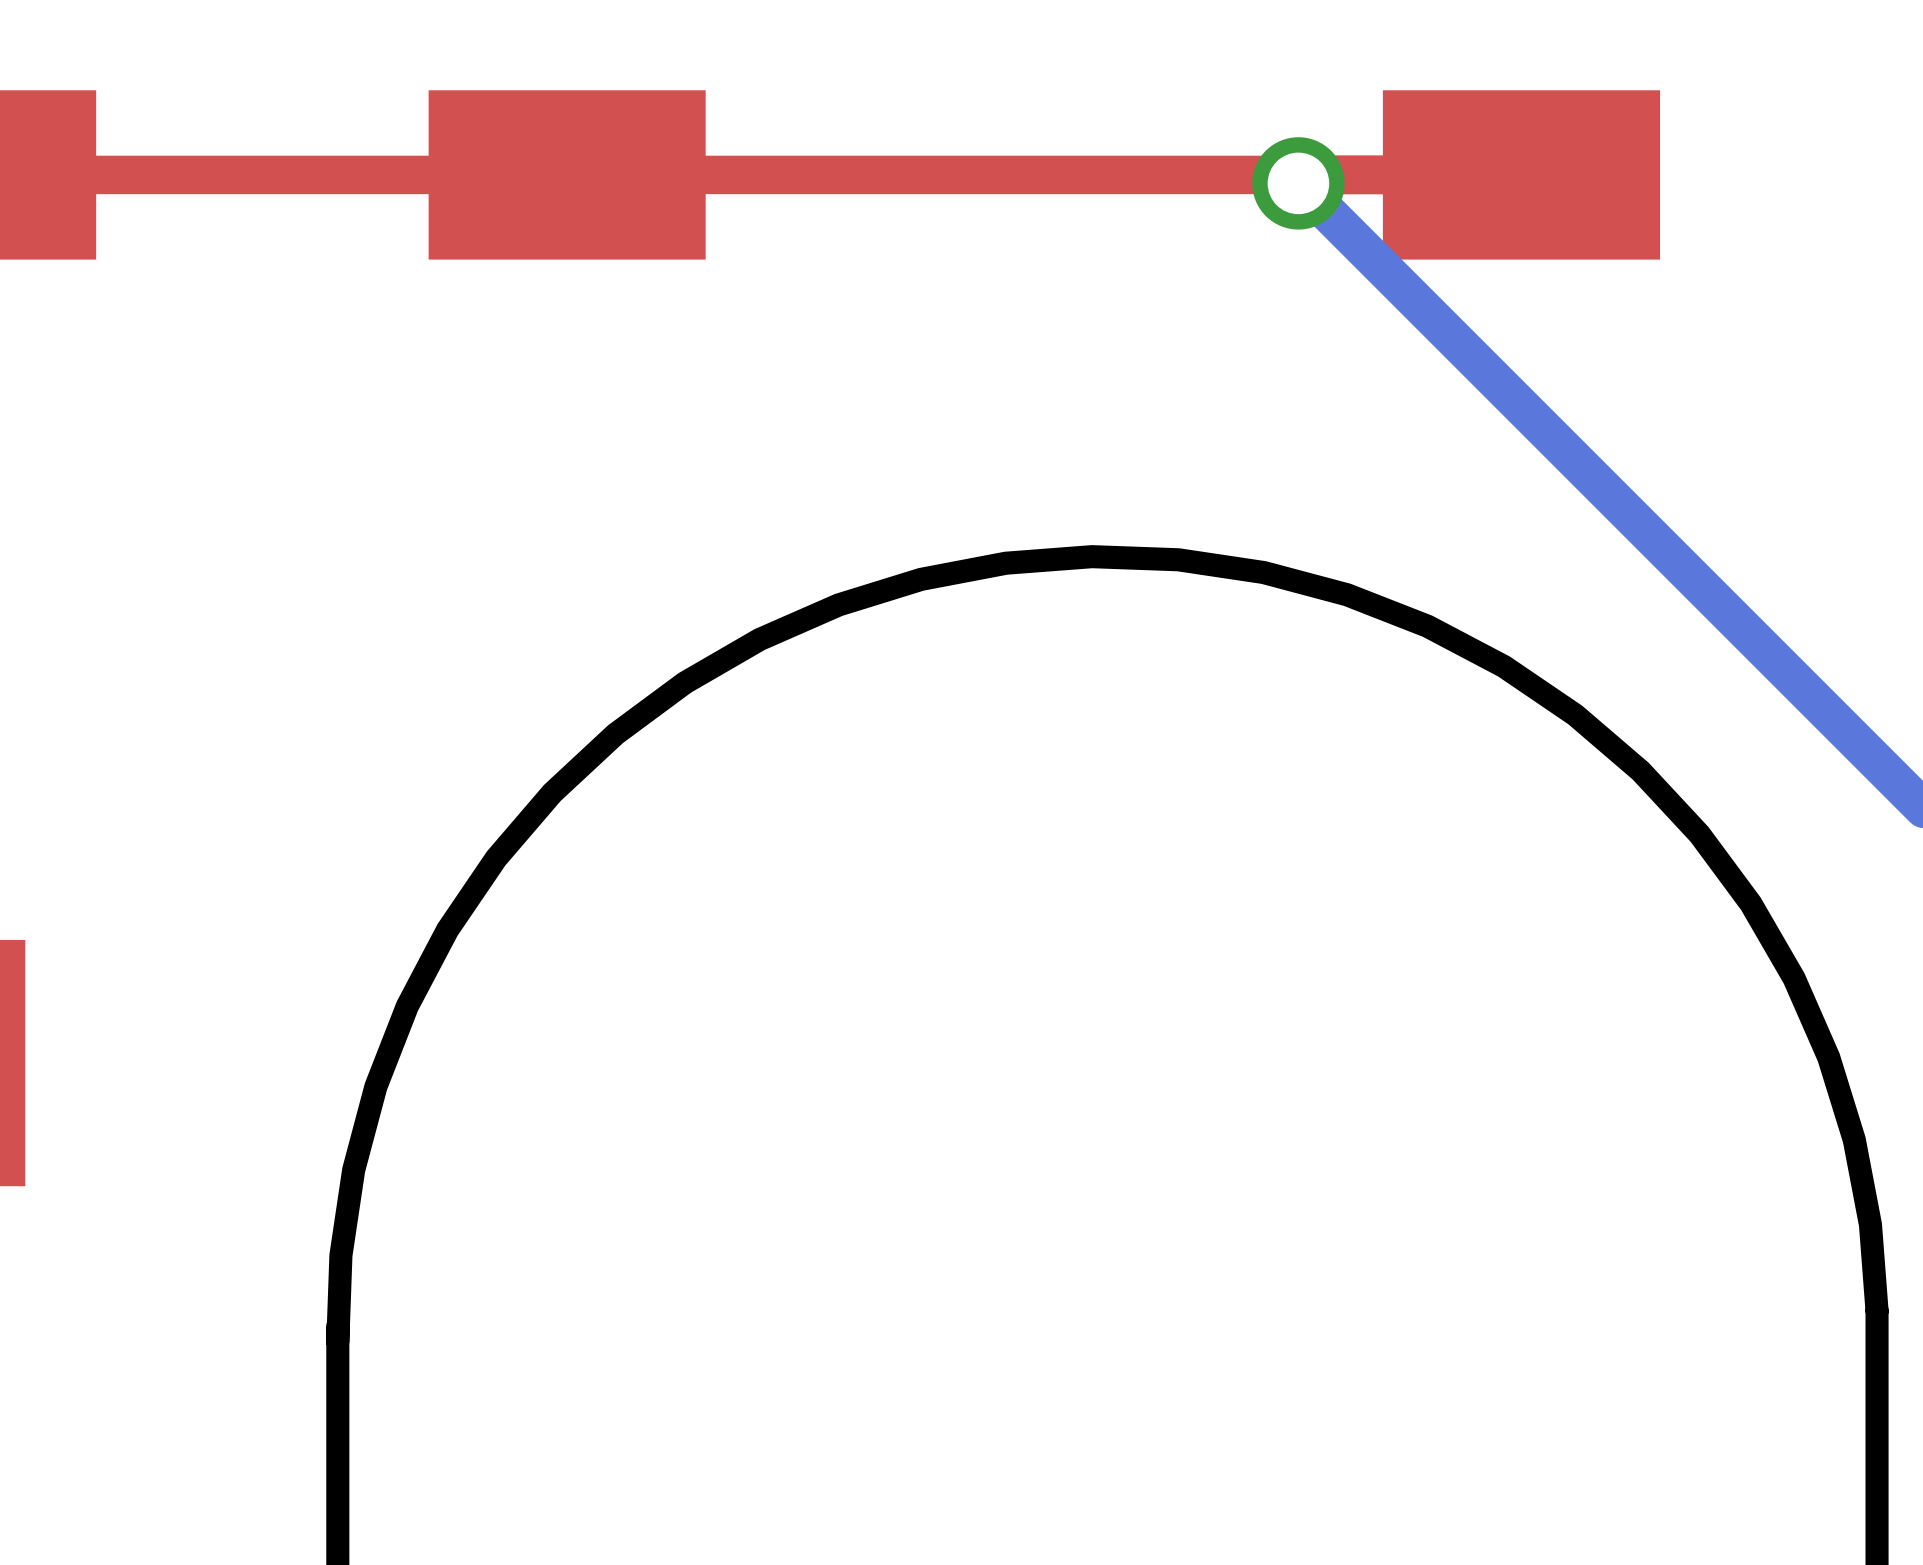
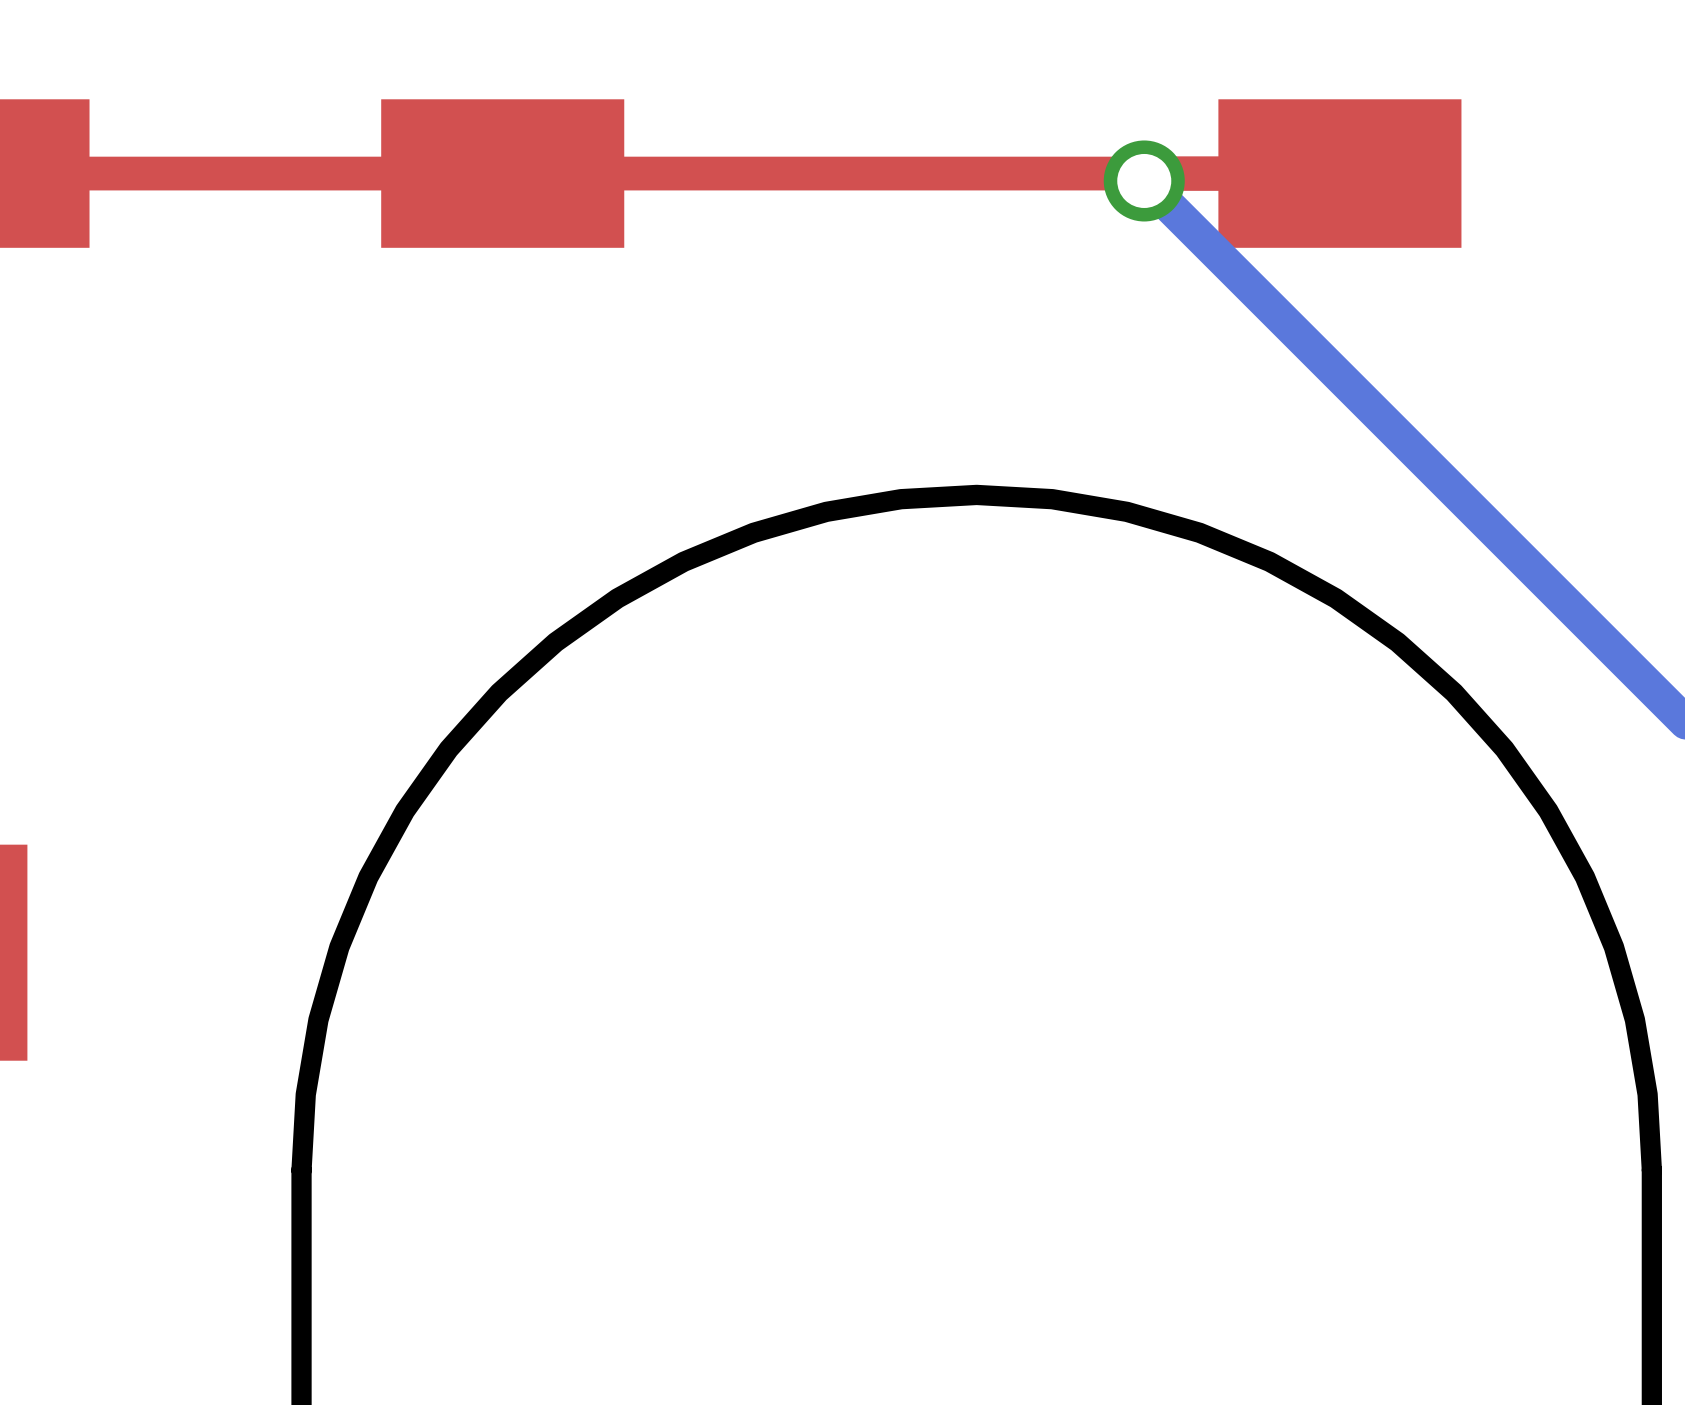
board edge: (1877, 1310) (1870, 1224) (1854, 1140) (1828, 1057) (1794, 978) (1750, 903) (1699, 834) (1640, 771) (1575, 714) (1503, 666) (1427, 626) (1347, 594) (1263, 572) (1178, 559) (1092, 556) (1005, 563) (921, 579) (838, 604) (759, 639) (684, 682) (615, 734) (552, 792) (496, 858) (447, 929) (407, 1006) (375, 1086) (353, 1170) (340, 1255) (337, 1341) -> (1651, 1170) (1647, 1094) (1634, 1019) (1613, 947) (1584, 877) (1548, 810) (1504, 749) (1454, 692) (1397, 642) (1335, 598) (1269, 561) (1199, 532) (1126, 511) (1052, 499) (976, 494) (901, 499) (826, 511) (753, 532) (683, 561) (617, 598) (555, 642) (499, 692) (448, 749) (405, 810) (368, 877) (339, 947) (318, 1019) (305, 1094) (301, 1183)

